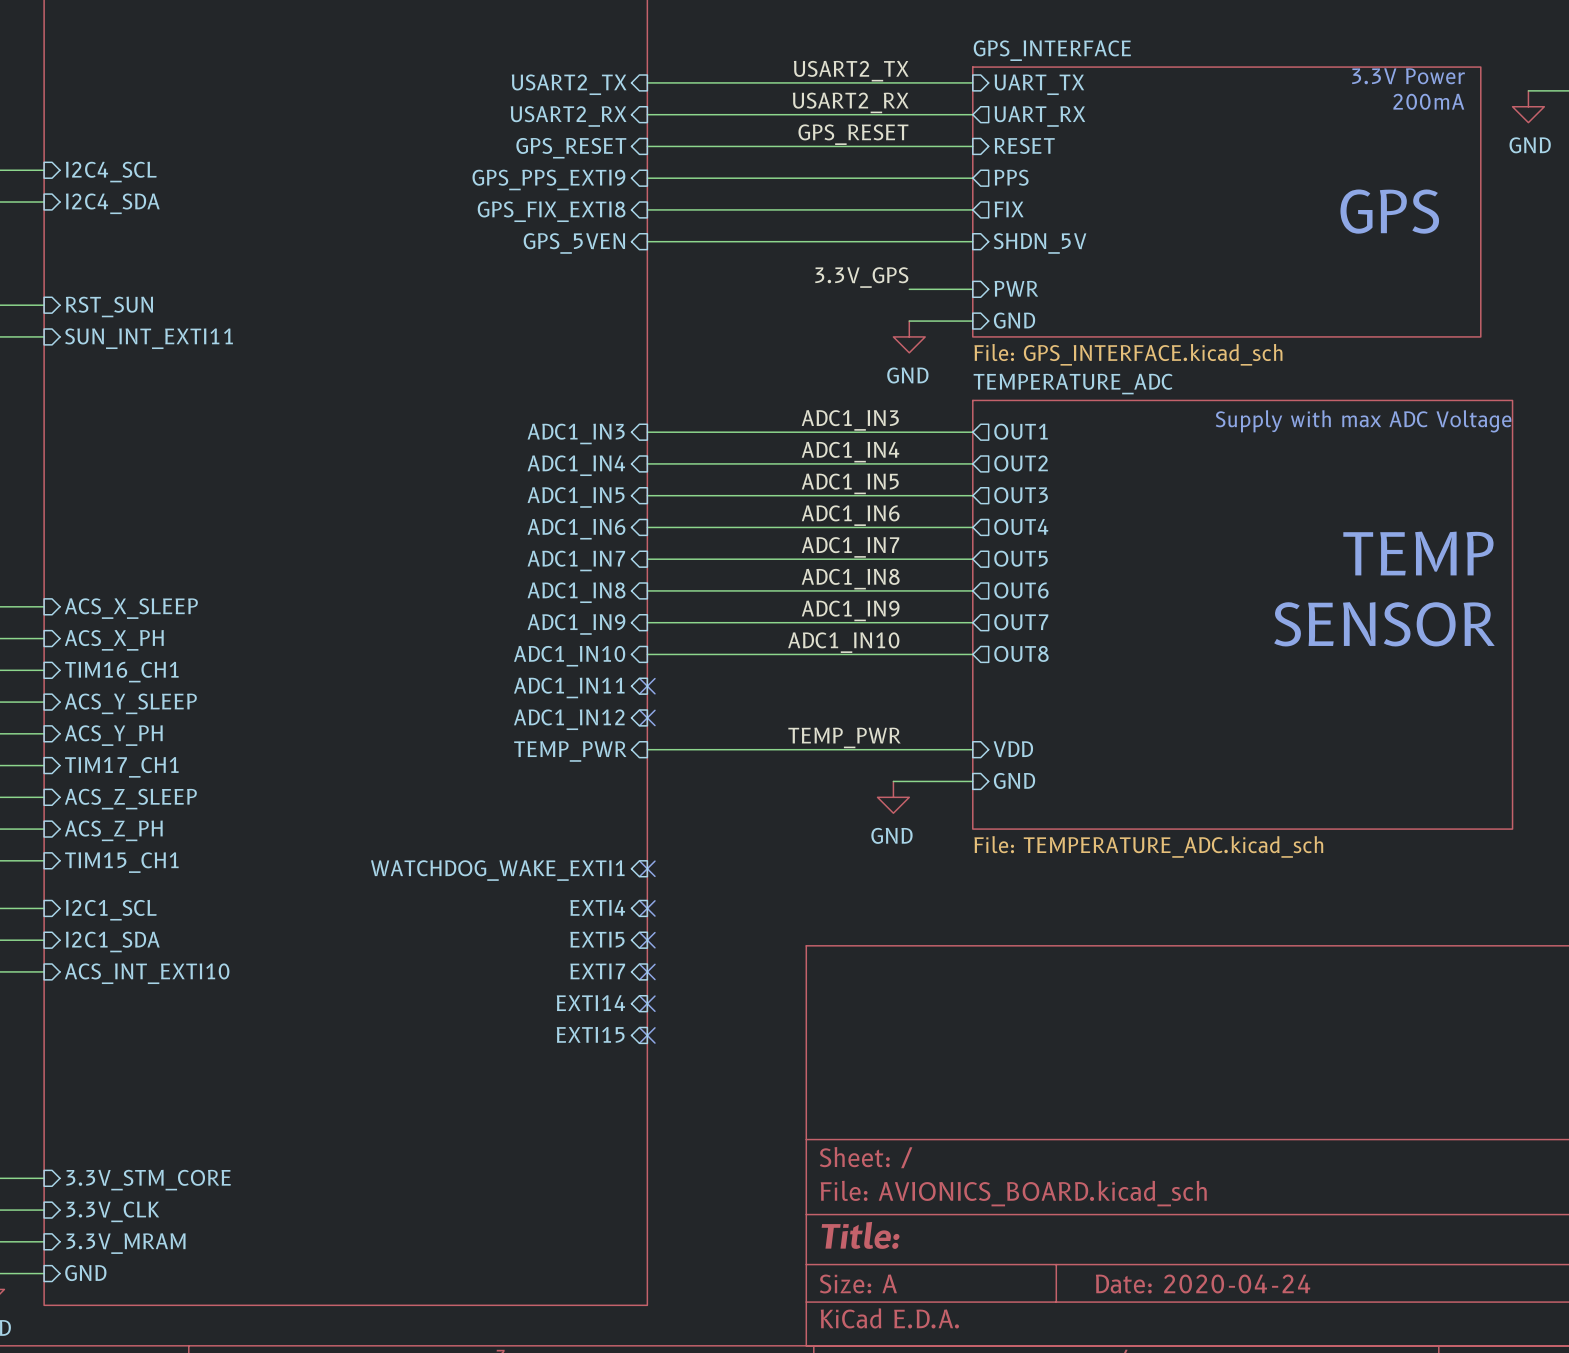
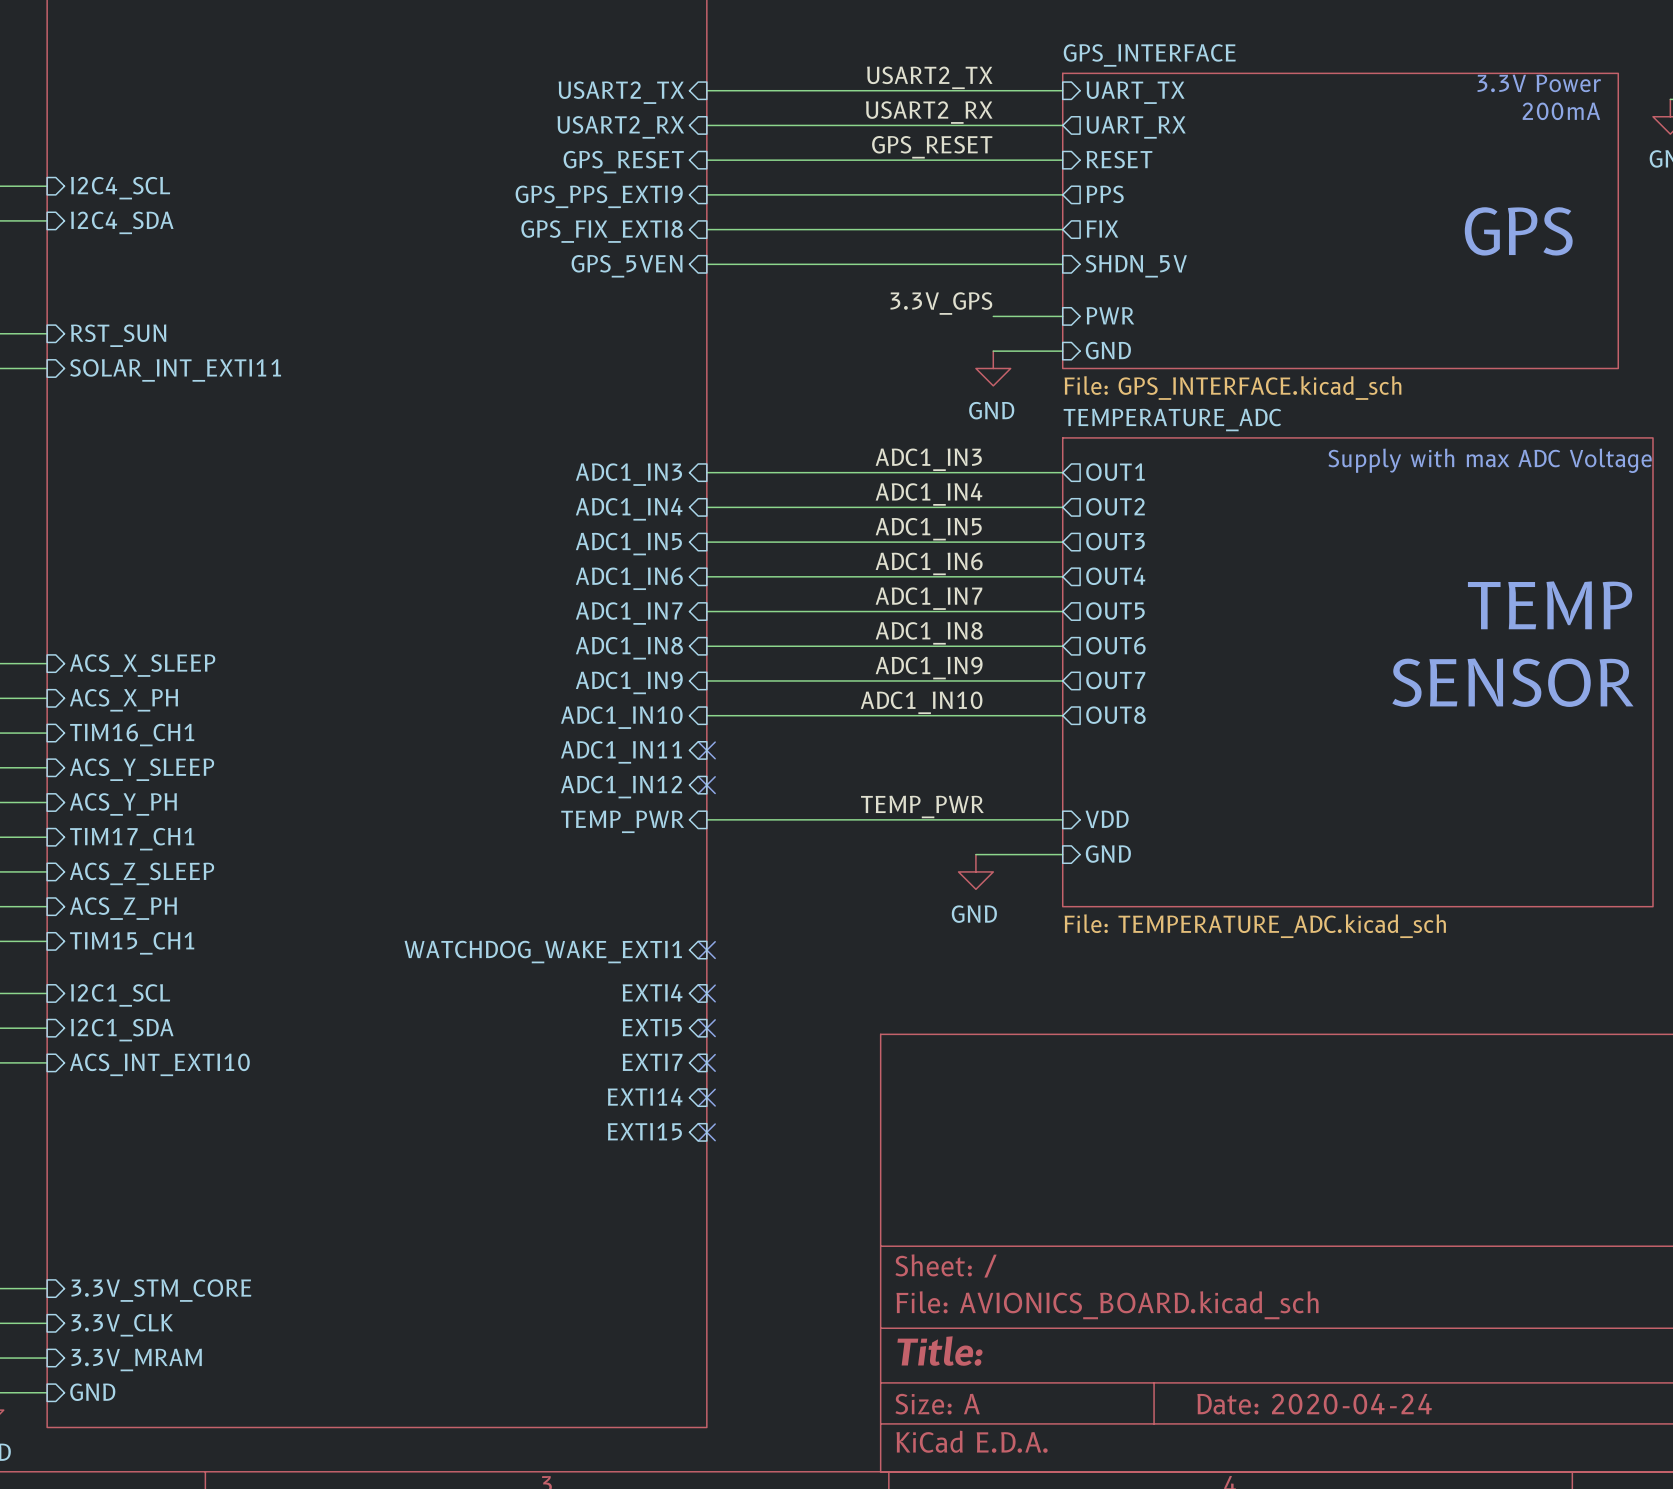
sheet pin: SUN_INT_EXTI11 (149, 338) -> SOLAR_INT_EXTI11 (175, 370)

